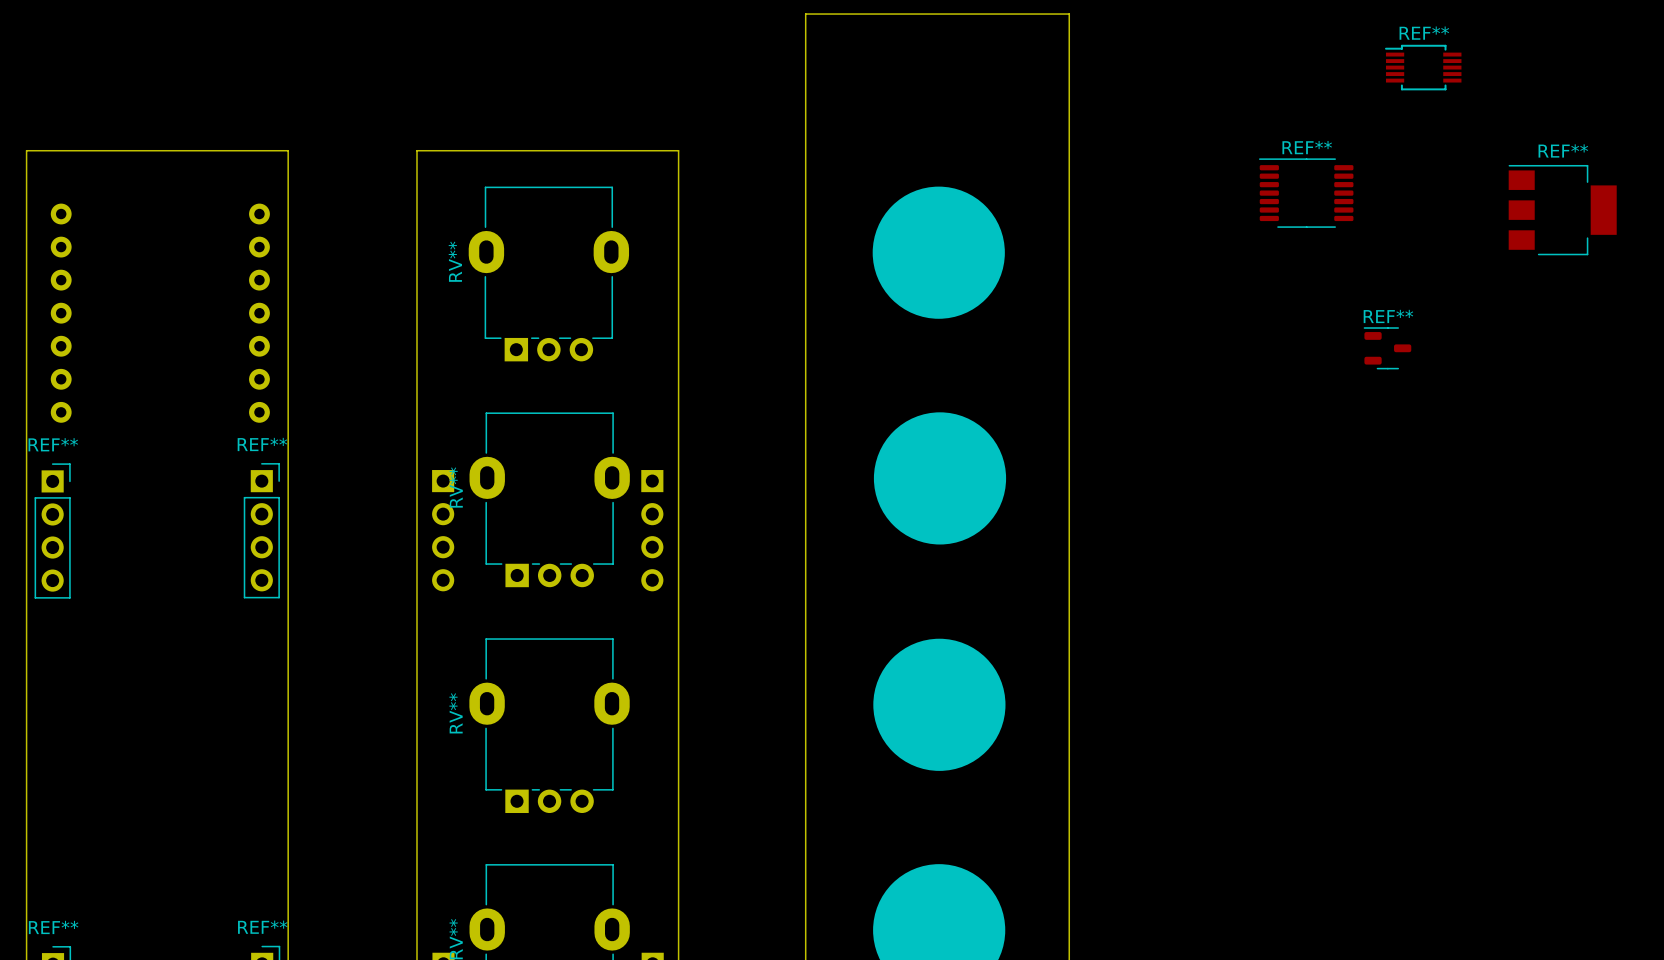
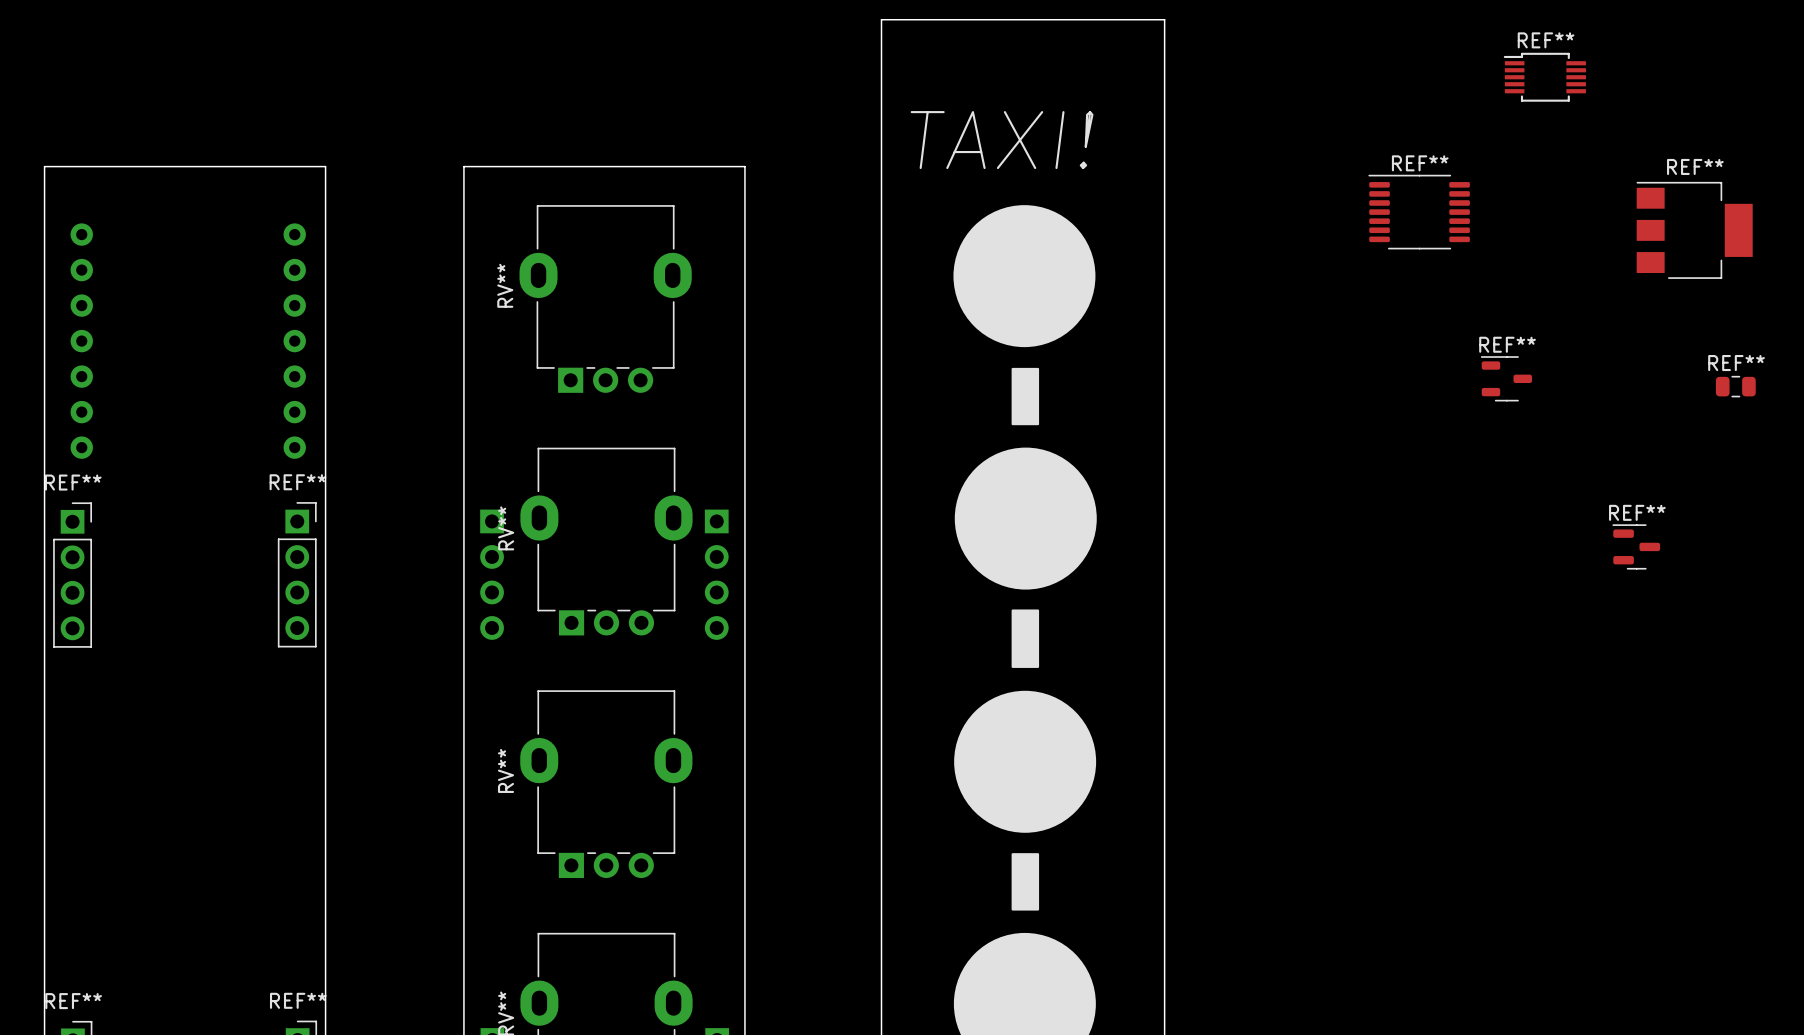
text: none -> TAXI! (1002, 140)
drawing: none -> [1011, 367, 1040, 426]
REF**: none -> (1735, 386)
REF**: none -> (1636, 546)
drawing: none -> [1011, 609, 1040, 668]
drawing: none -> [1011, 853, 1040, 911]

